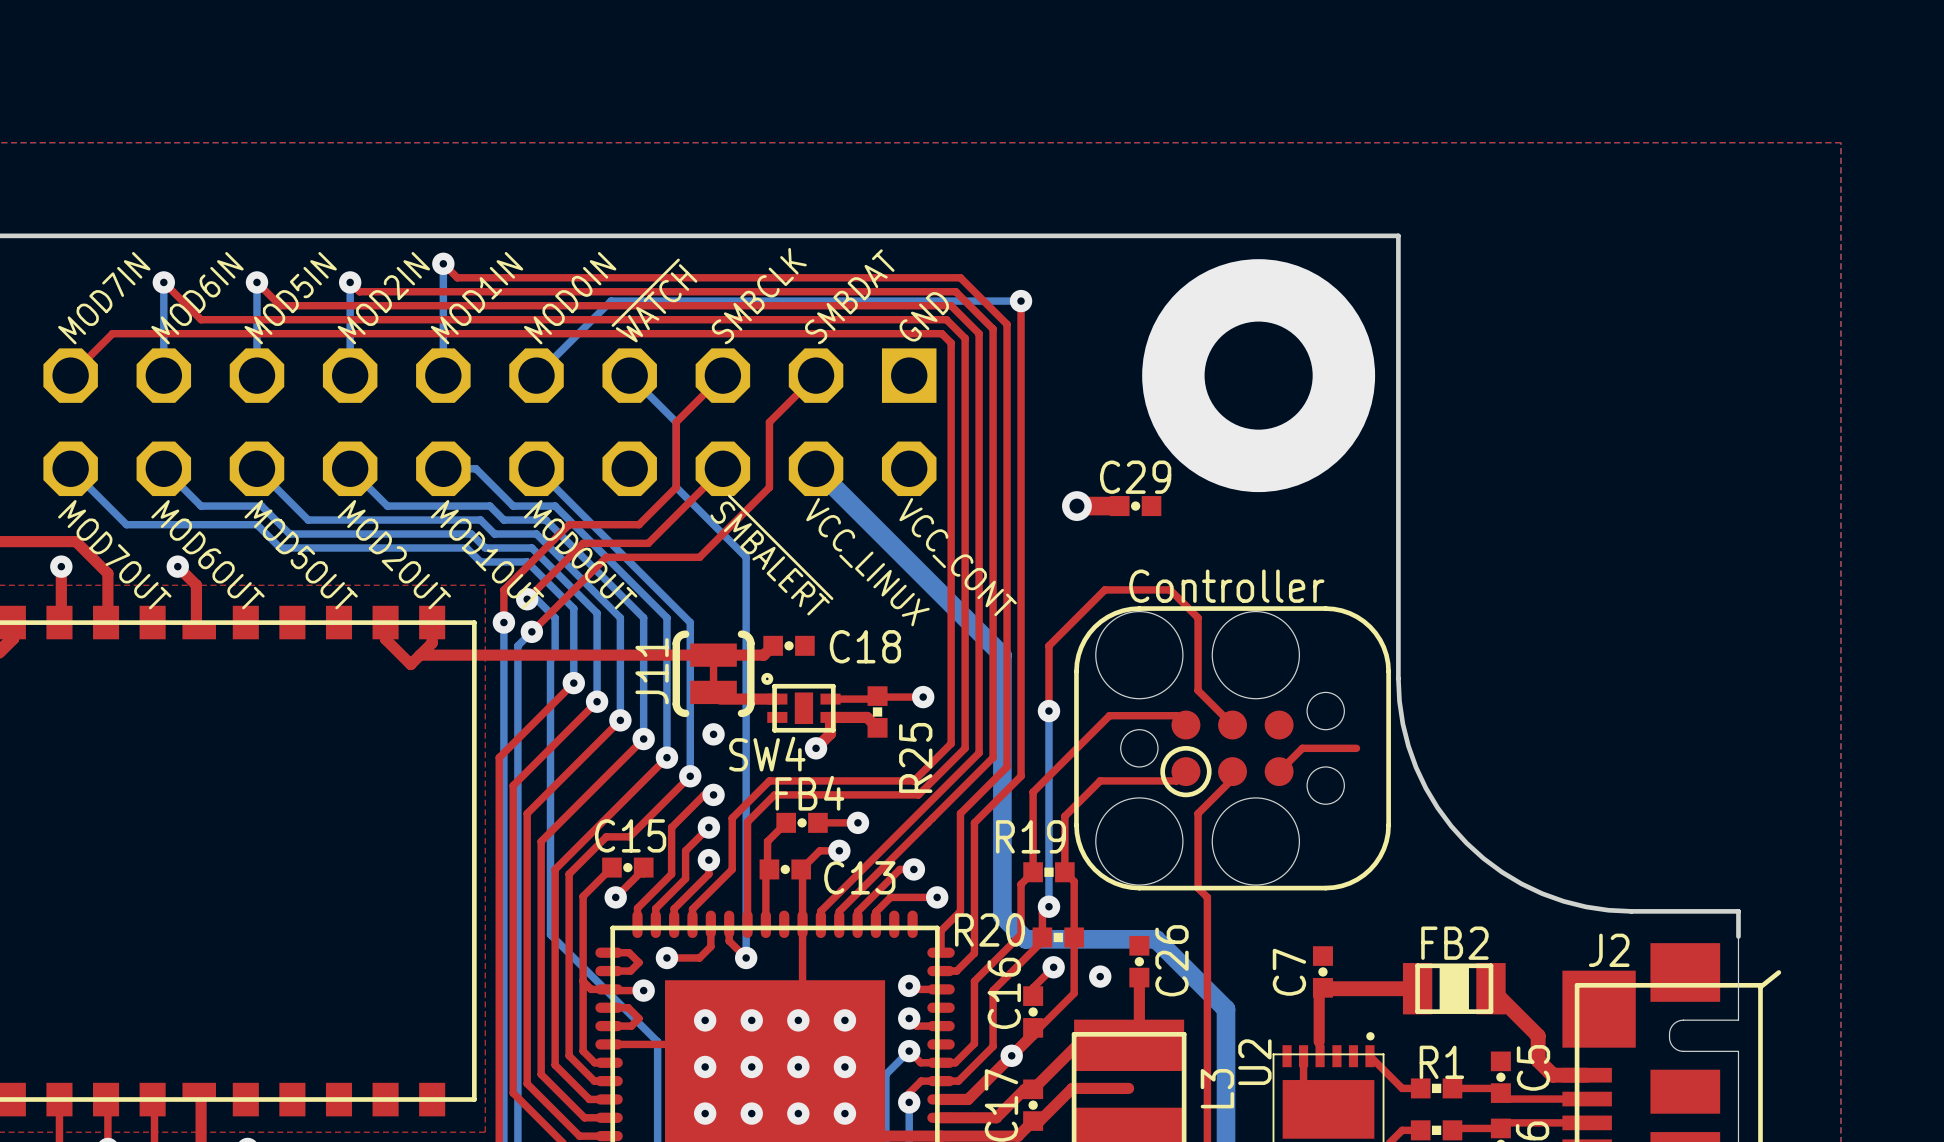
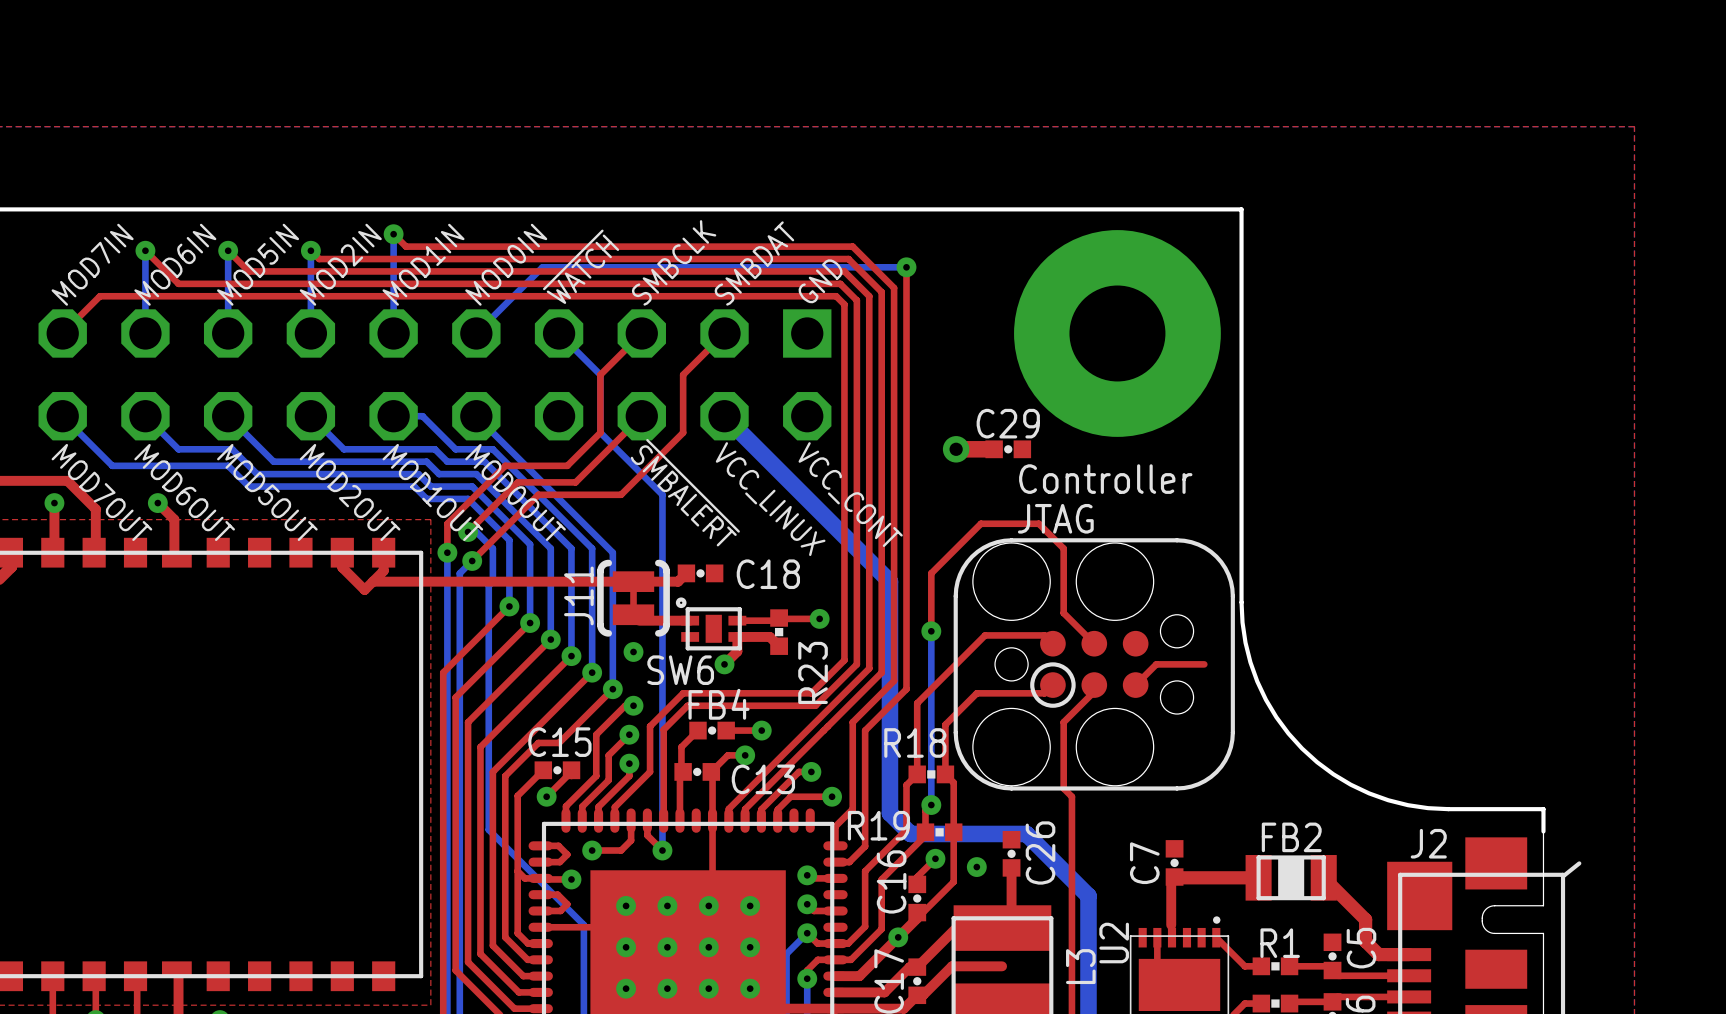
text: none -> JTAG (1055, 518)
text position: Controller (1226, 586) -> Controller (1105, 479)
SW4 name: SW4 (767, 754) -> SW6 (680, 670)
R25 name: R25 (915, 757) -> R23 (813, 672)
R19 name: R19 (1030, 836) -> R18 (915, 742)
R20 name: R20 (989, 930) -> R19 (878, 825)

